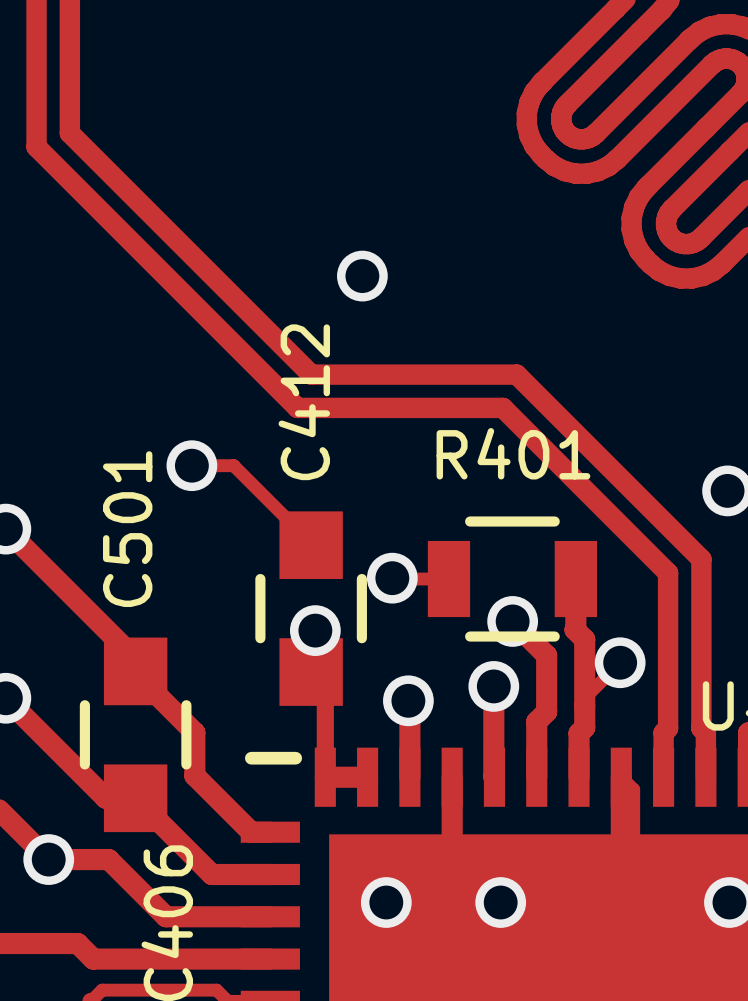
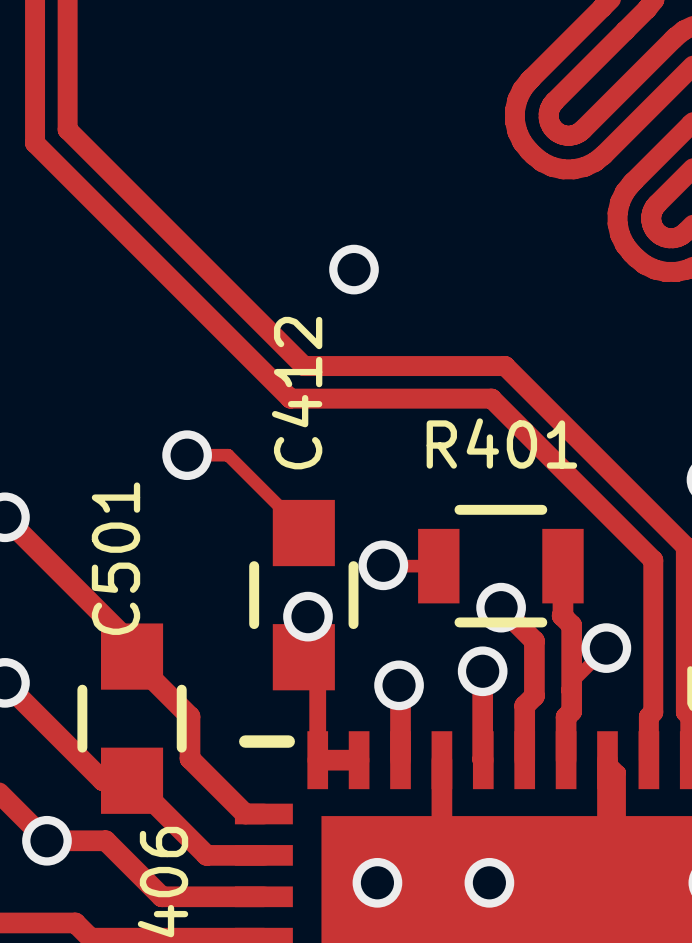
C501 name position: C501 (127, 529) -> C501 (115, 558)

